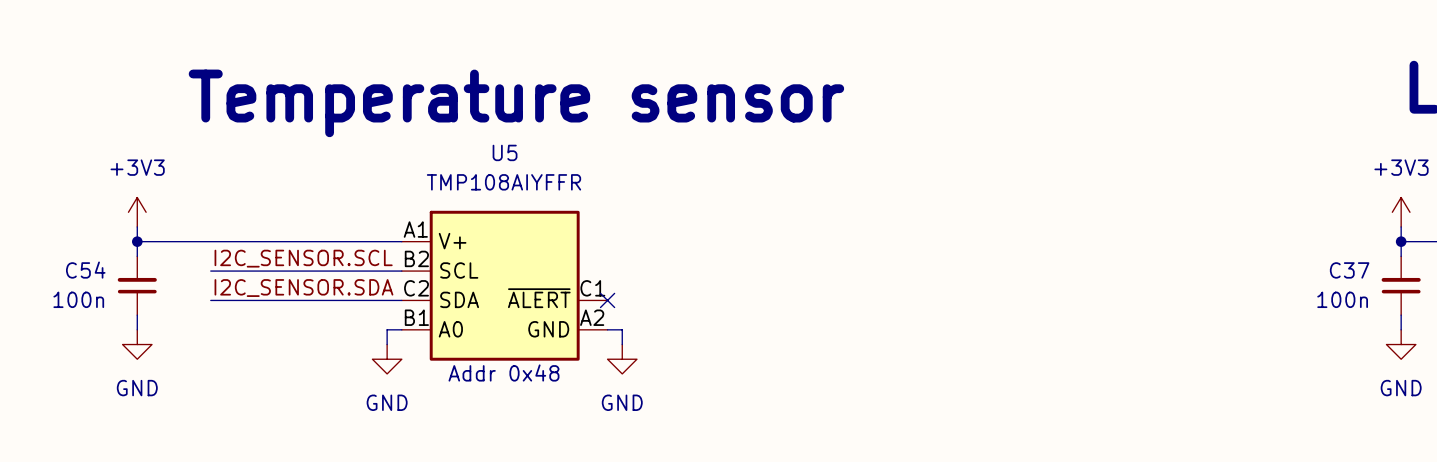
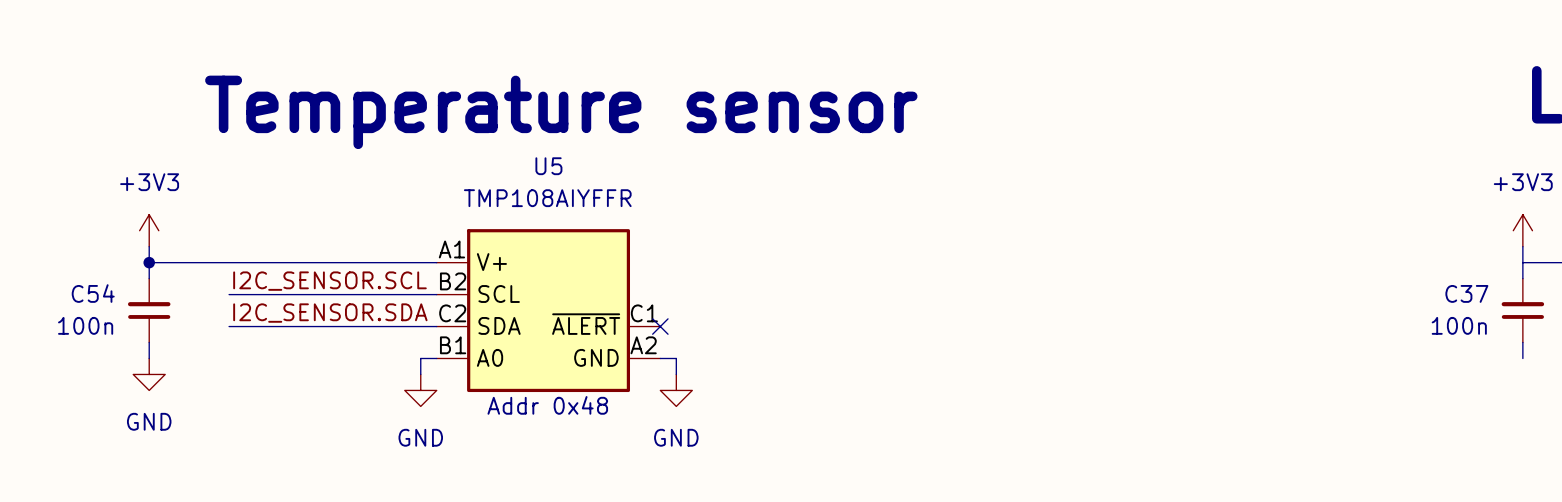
junction: (1401, 241) -> none
power symbol: GND (1401, 344) -> none

